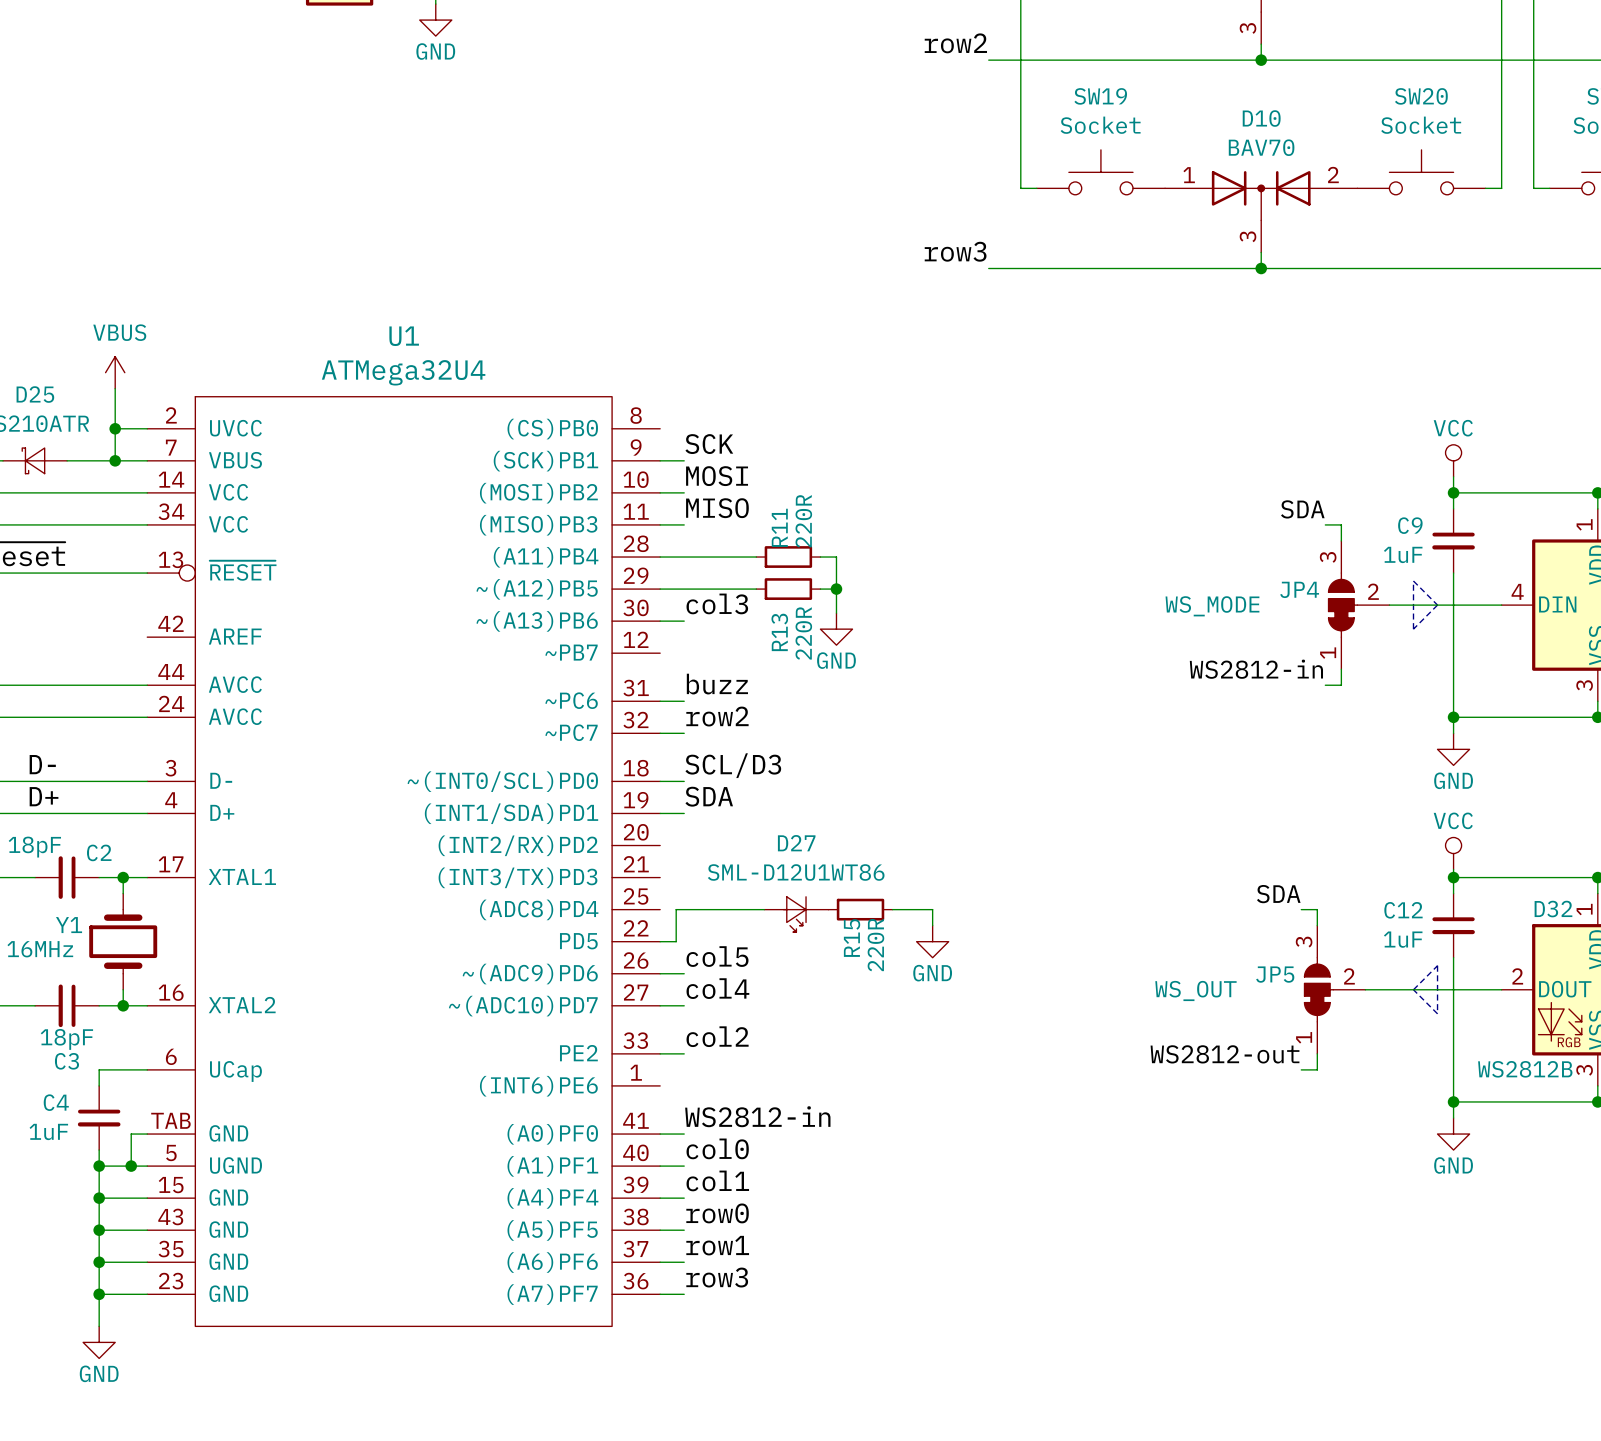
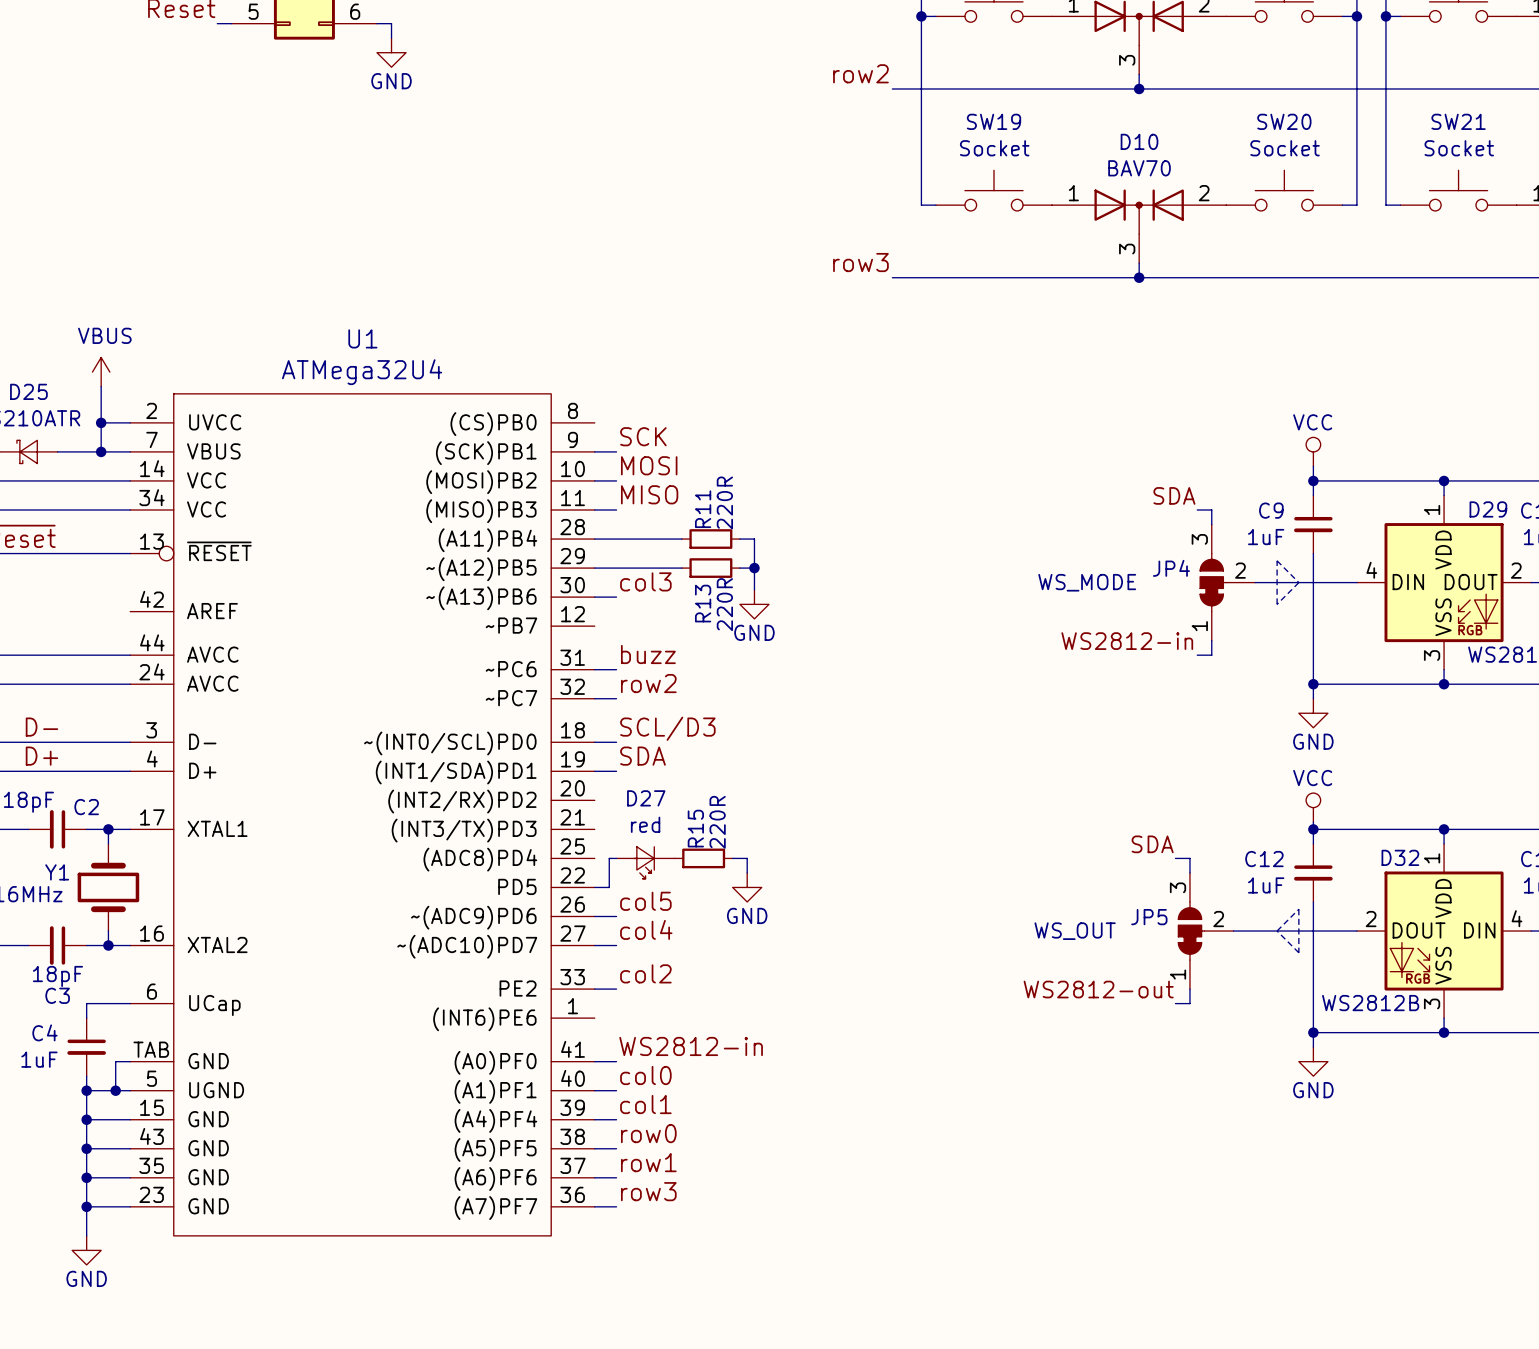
D27 value: SML-D12U1WT86 (796, 872) -> red (645, 824)
wire: none -> (732, 858) (747, 858) (747, 872)
R15 position: (860, 909) -> (703, 858)
wire: (892, 909) (932, 909) (932, 925) -> none
D27 position: (796, 914) -> (645, 862)
R15 name position: R15 (852, 938) -> R15 (695, 828)
power symbol position: GND (932, 941) -> GND (747, 887)
R15 value position: 220R (875, 945) -> 220R (717, 822)

